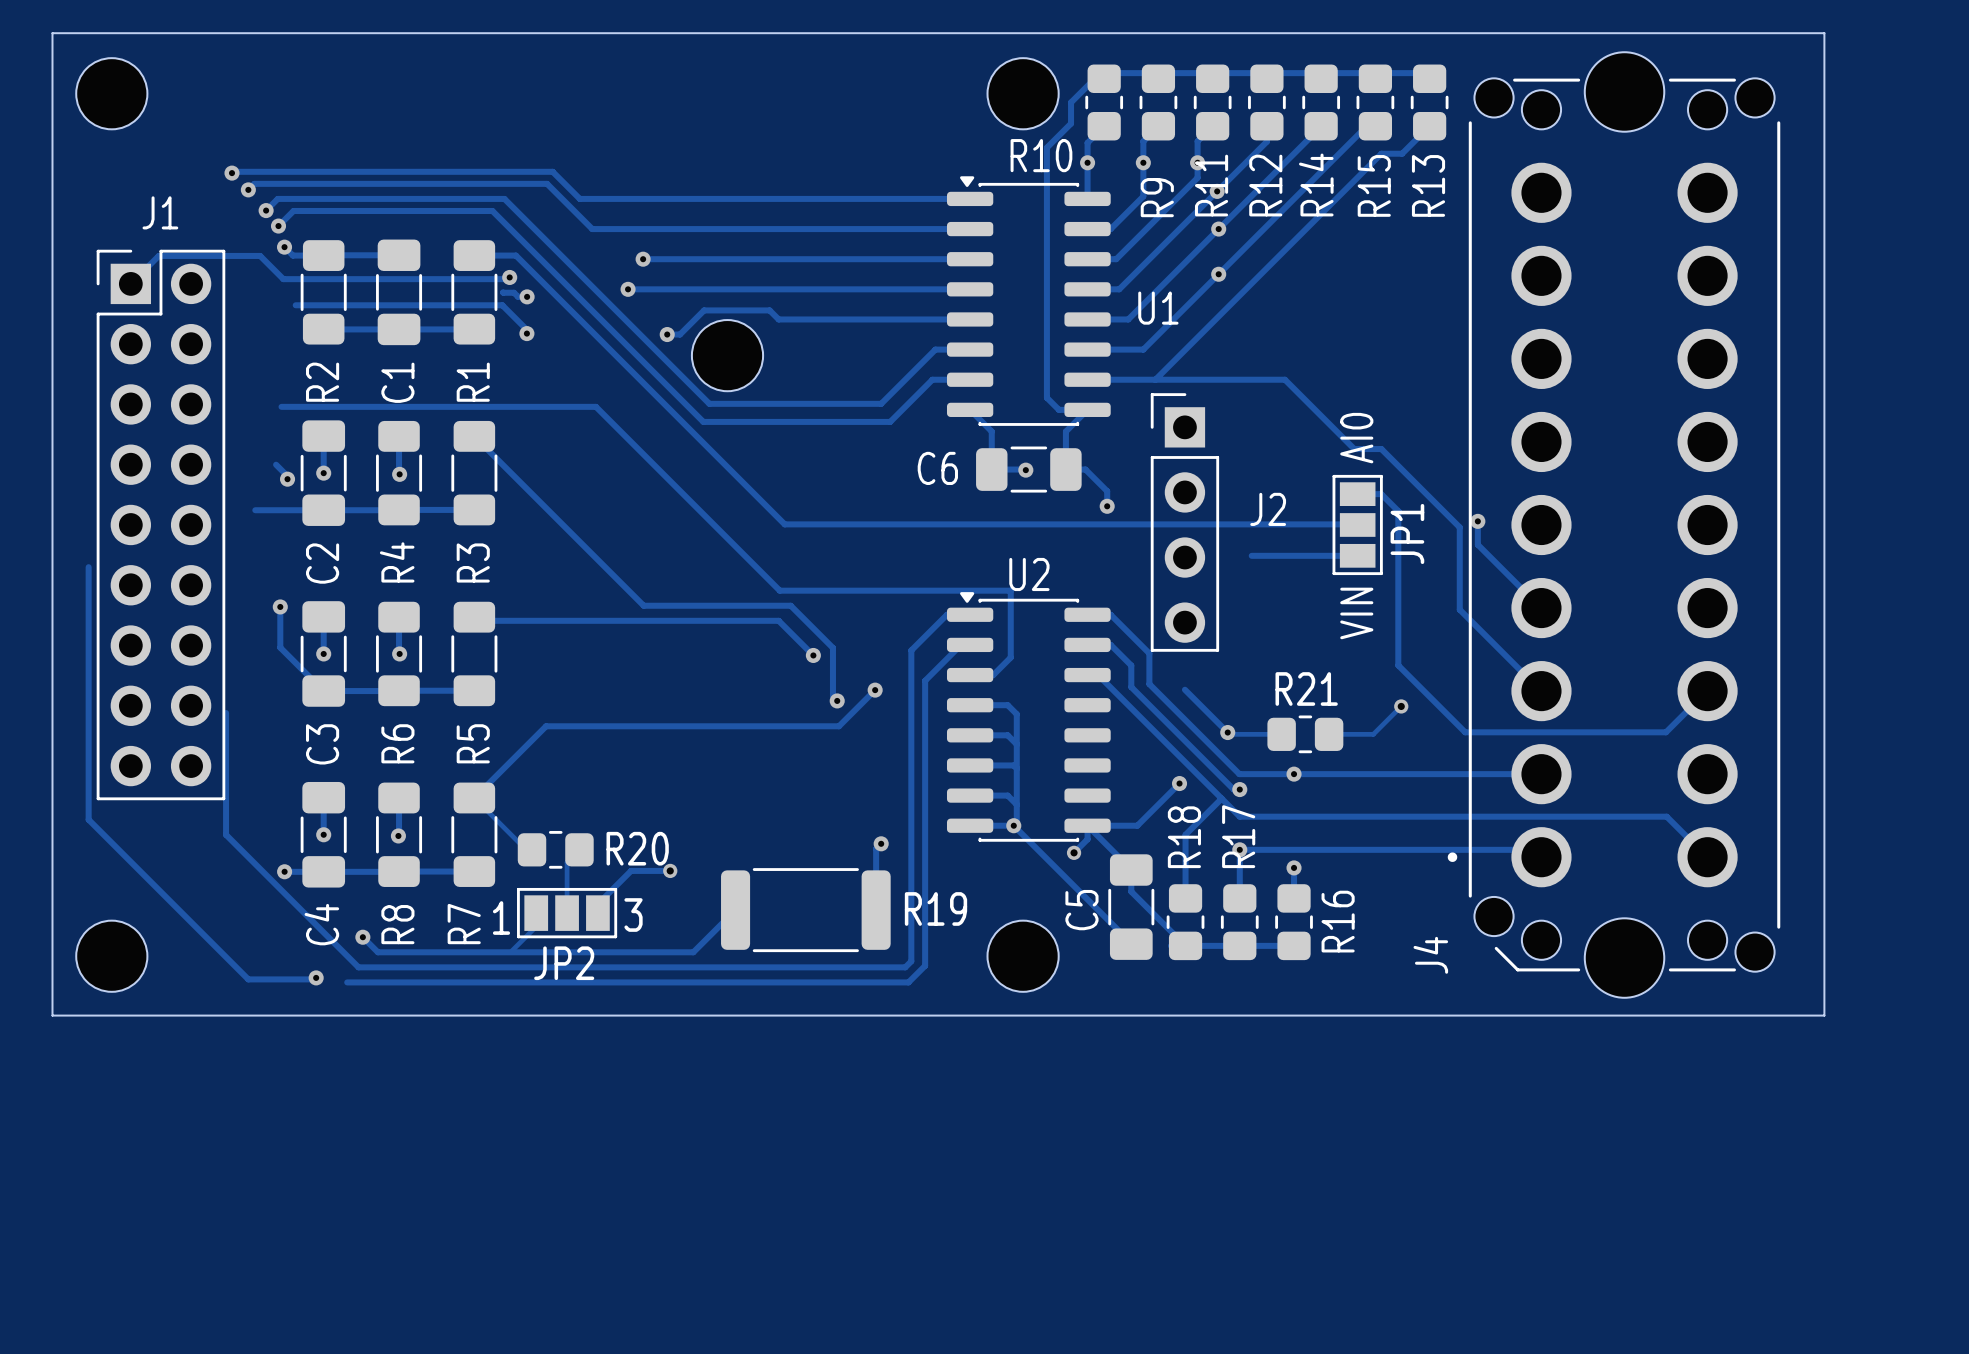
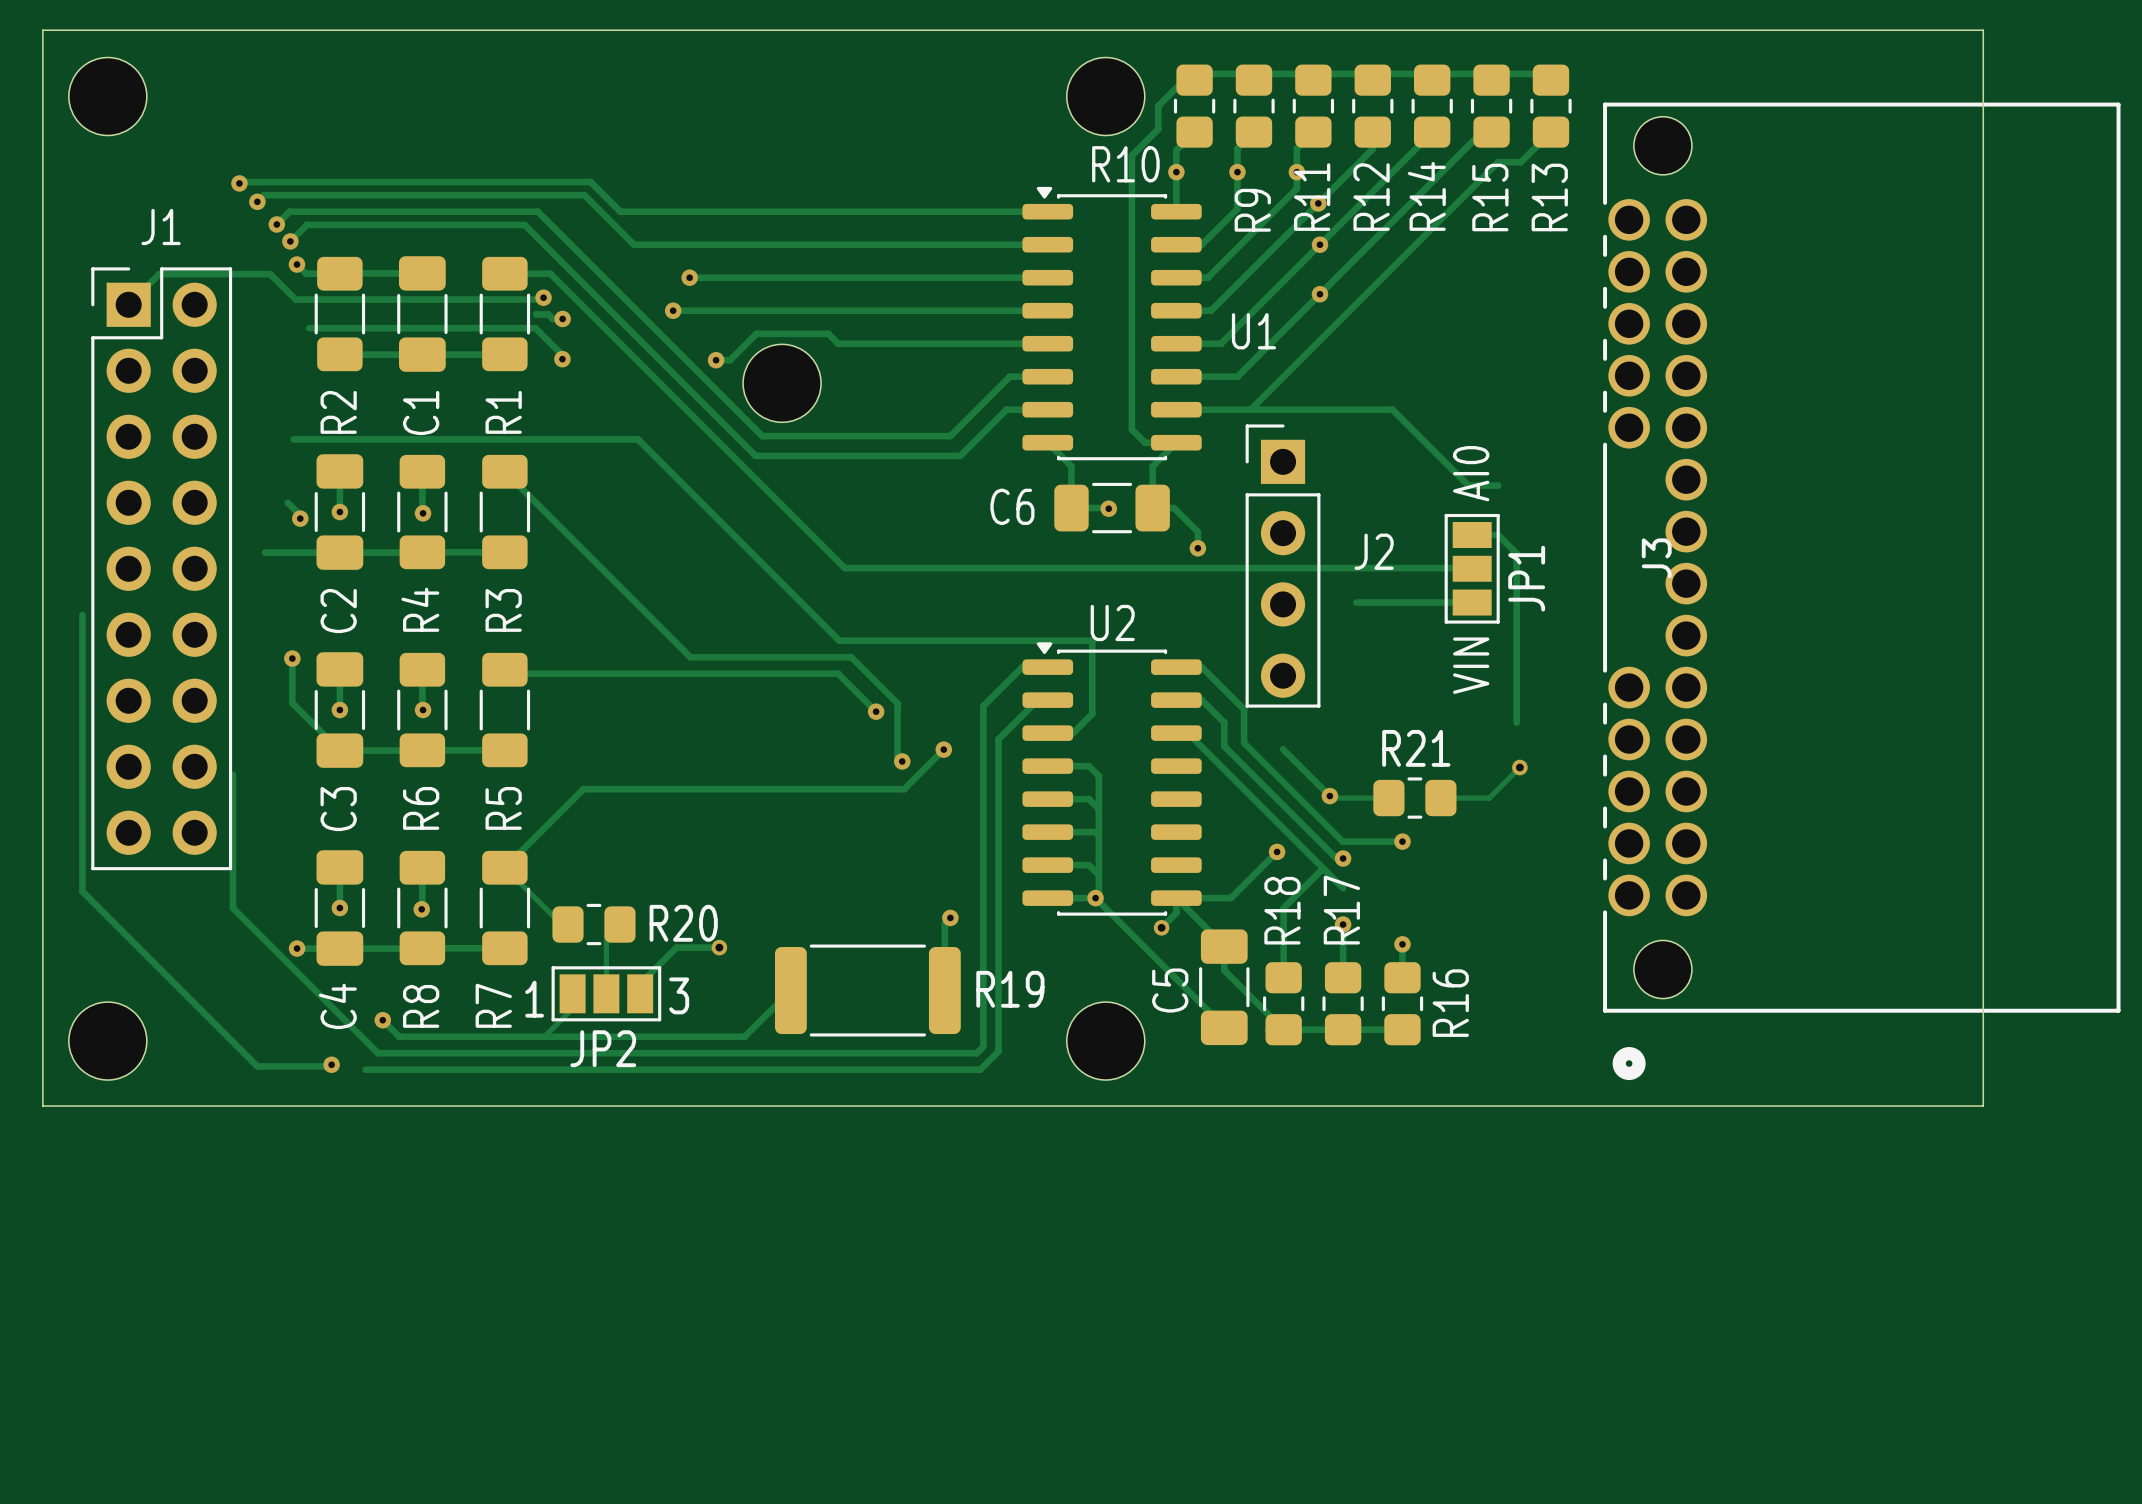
track: (1381, 449) (1459, 527) (1459, 609) (1541, 691) -> none
track: (1477, 521) (1477, 544) (1541, 608) -> none
via: (1477, 521) -> none
J4: (1614, 525) -> none
J3: none -> (1861, 591)
track: (1398, 665) (1465, 732) (1666, 732) (1707, 691) -> none
track: (1294, 774) (1541, 774) -> none
track: (1239, 816) (1666, 816) (1707, 857) -> none
track: (1239, 849) (1533, 849) -> none

